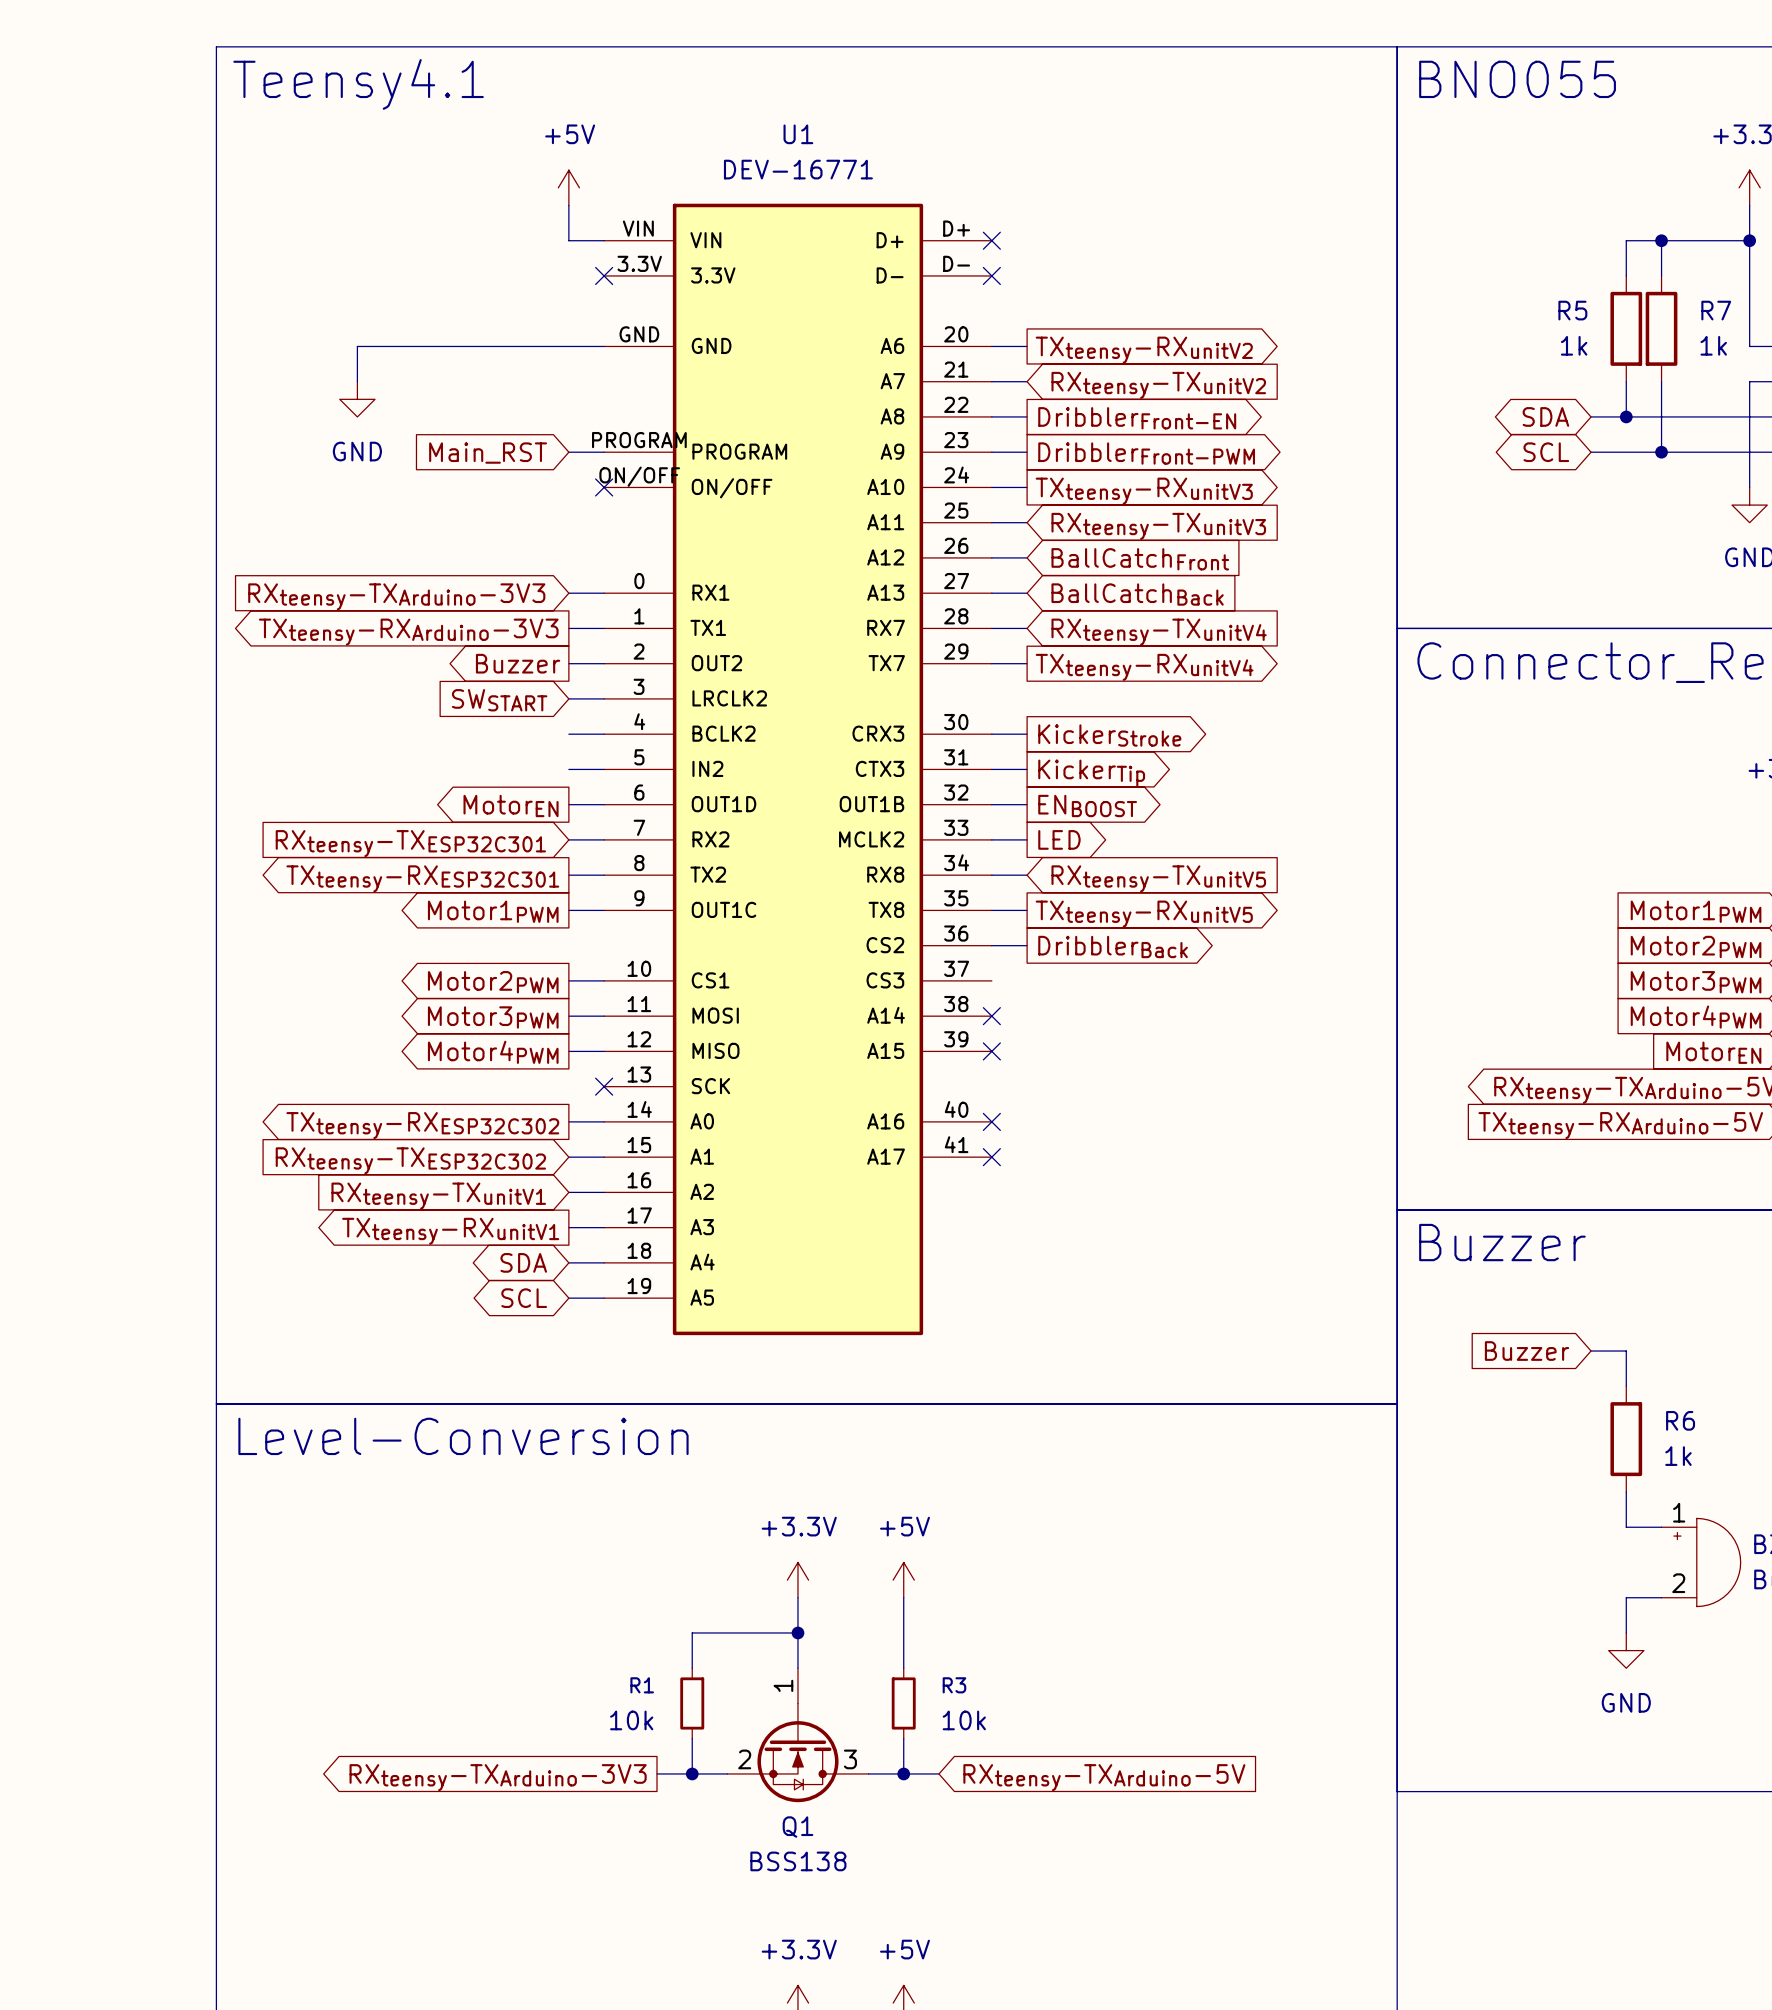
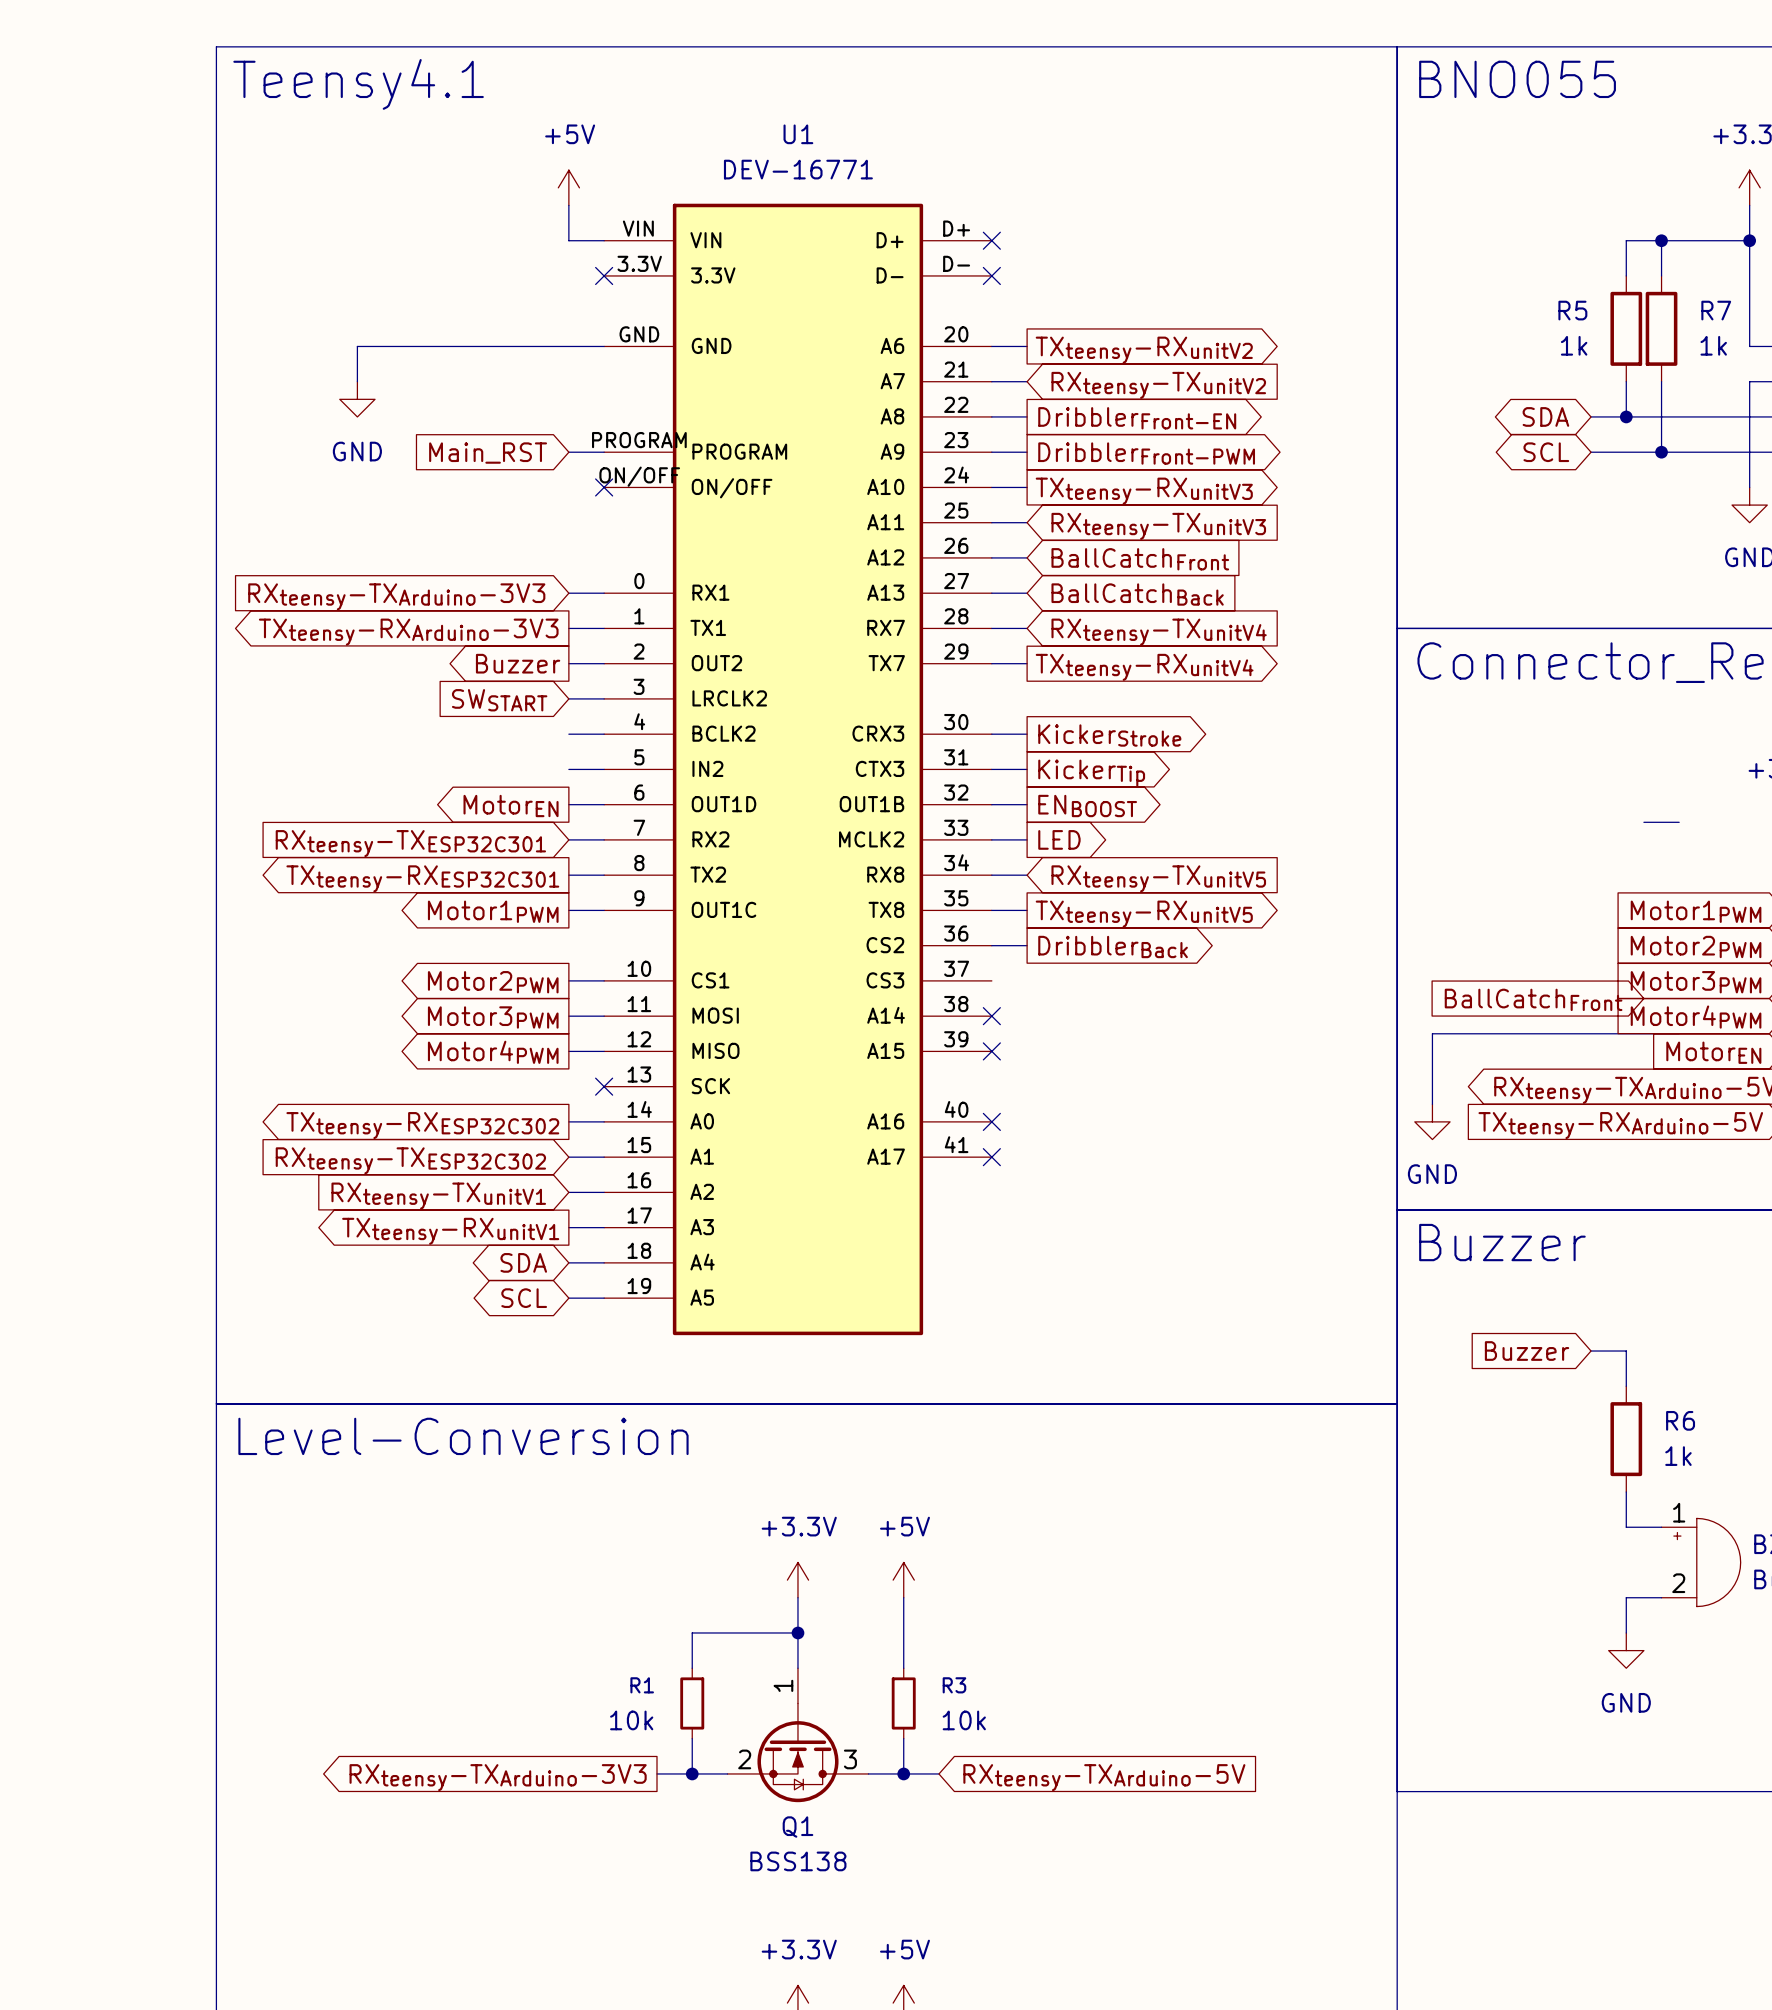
wire: none -> (1643, 822) (1679, 822)
global label: none -> BallCatchFront (1533, 999)
wire: none -> (1679, 1033) (1432, 1033) (1432, 1104)
power symbol: none -> GND (1432, 1121)

